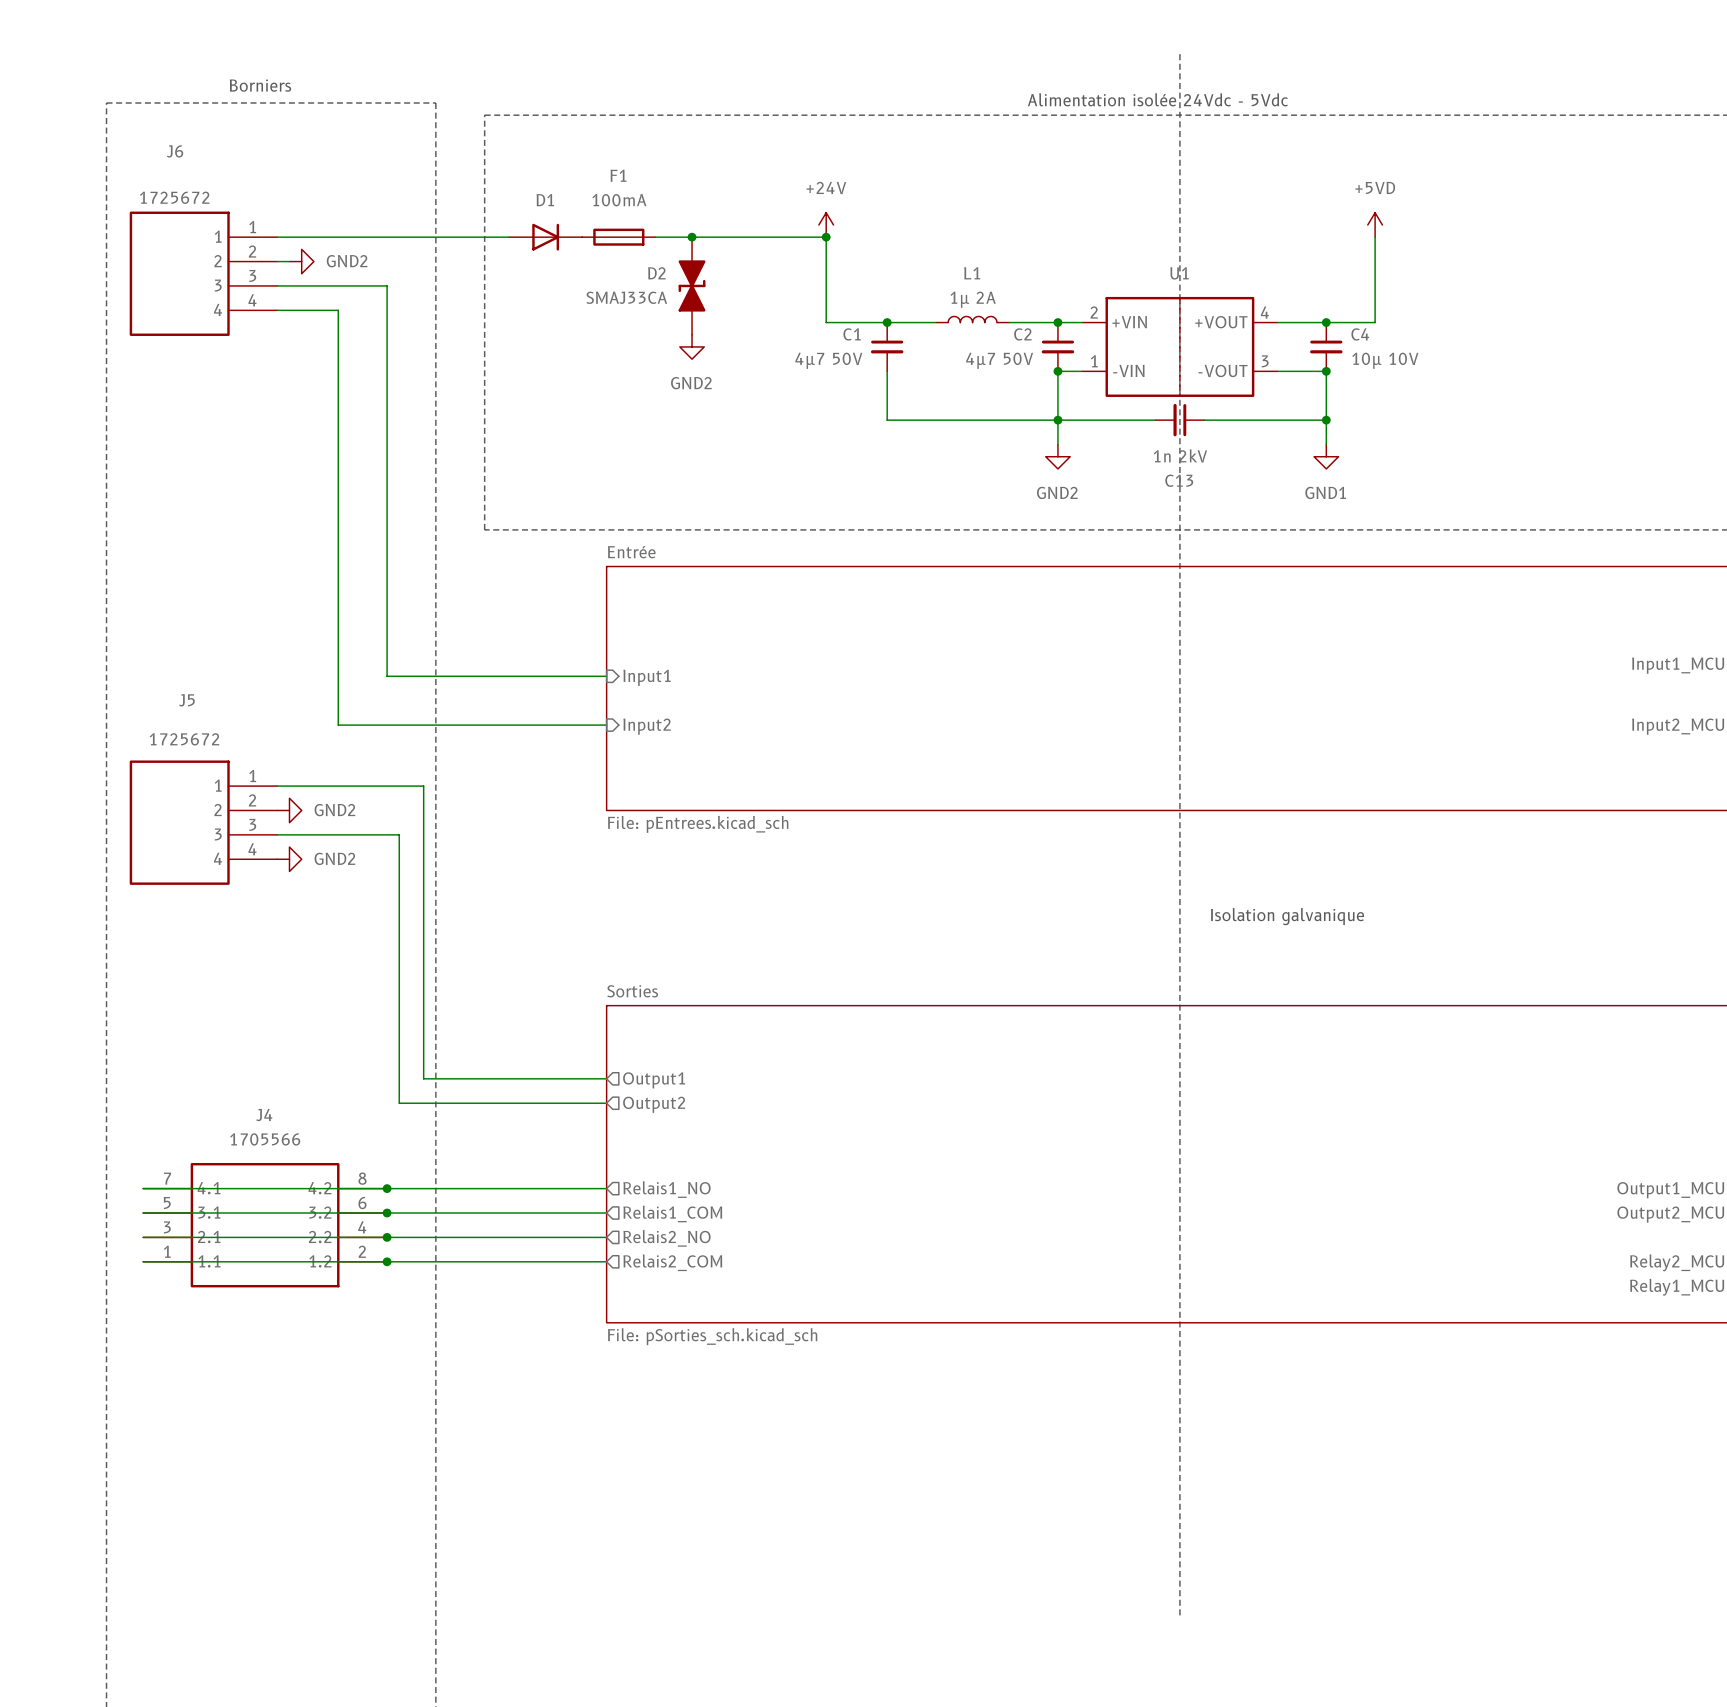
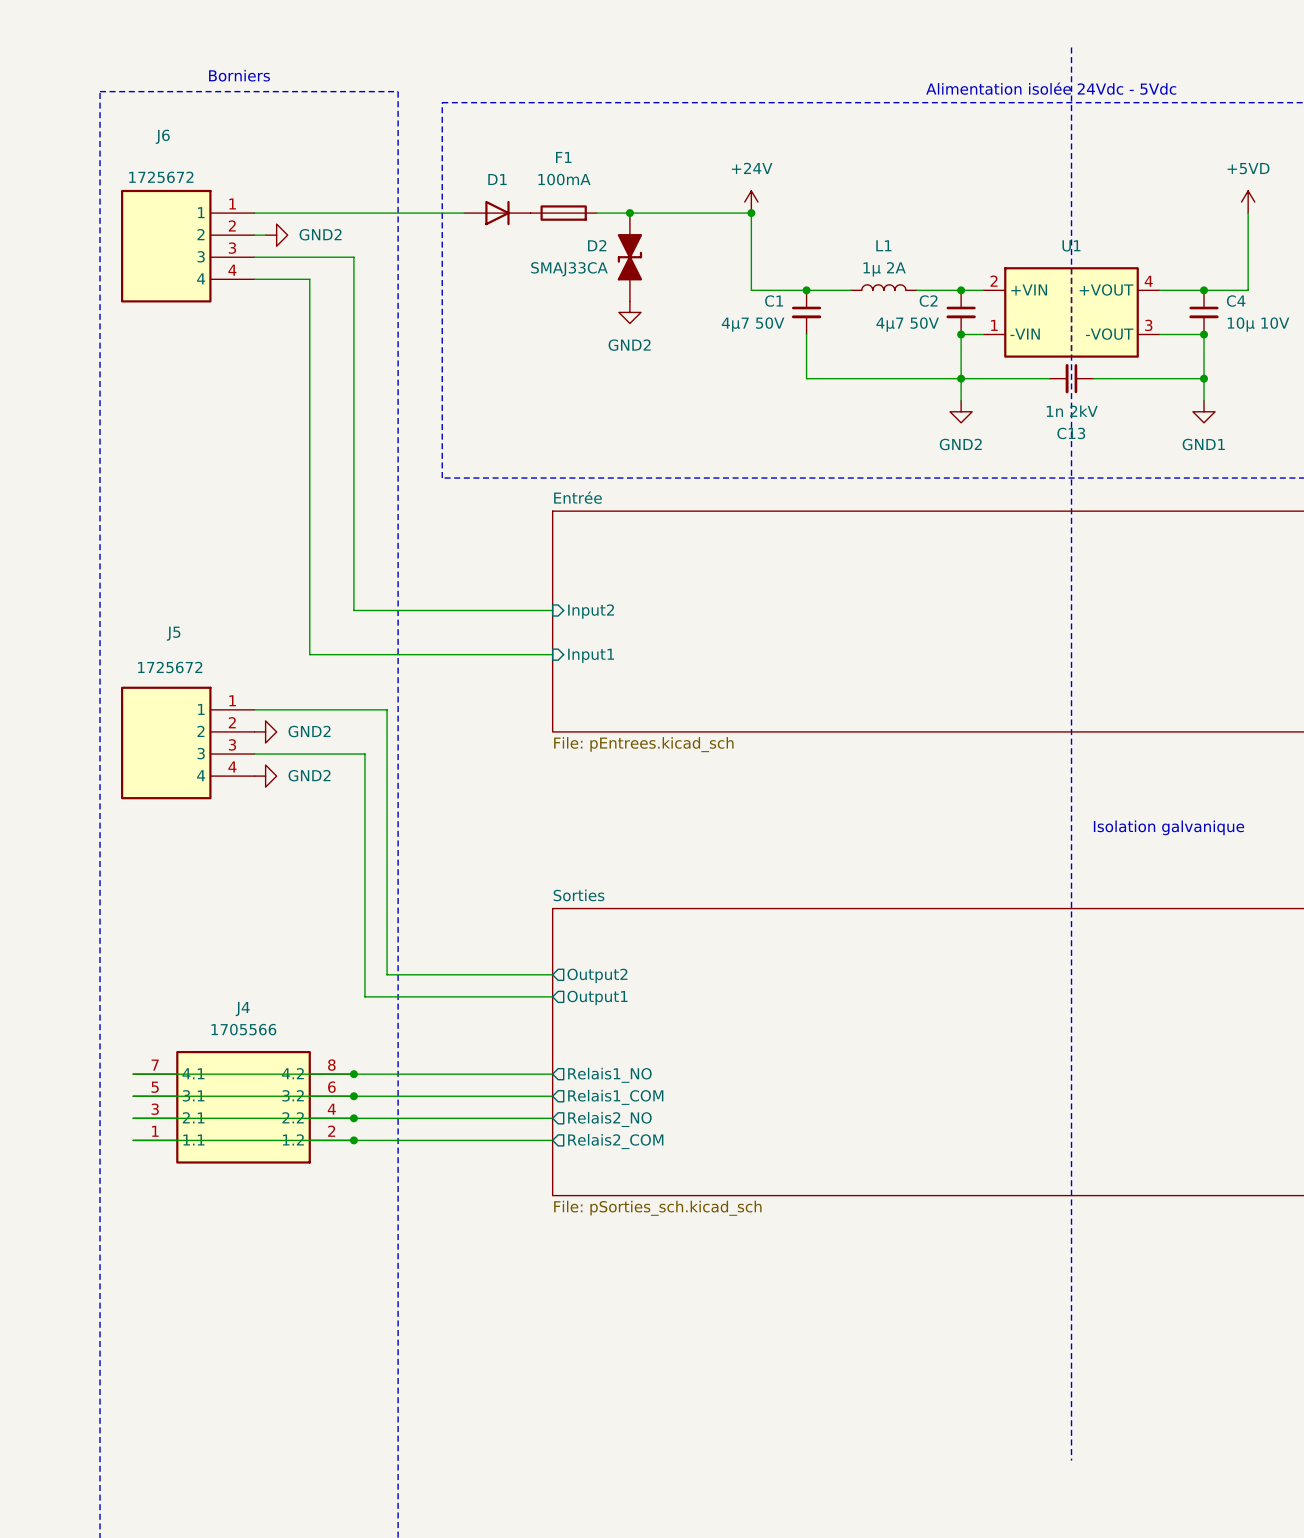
sheet pin: Input1 (647, 677) -> Input2 (591, 611)
sheet pin: Input2 (647, 726) -> Input1 (591, 655)
sheet pin: Output1 (654, 1080) -> Output2 (597, 975)
sheet pin: Output2 (654, 1104) -> Output1 (597, 997)

